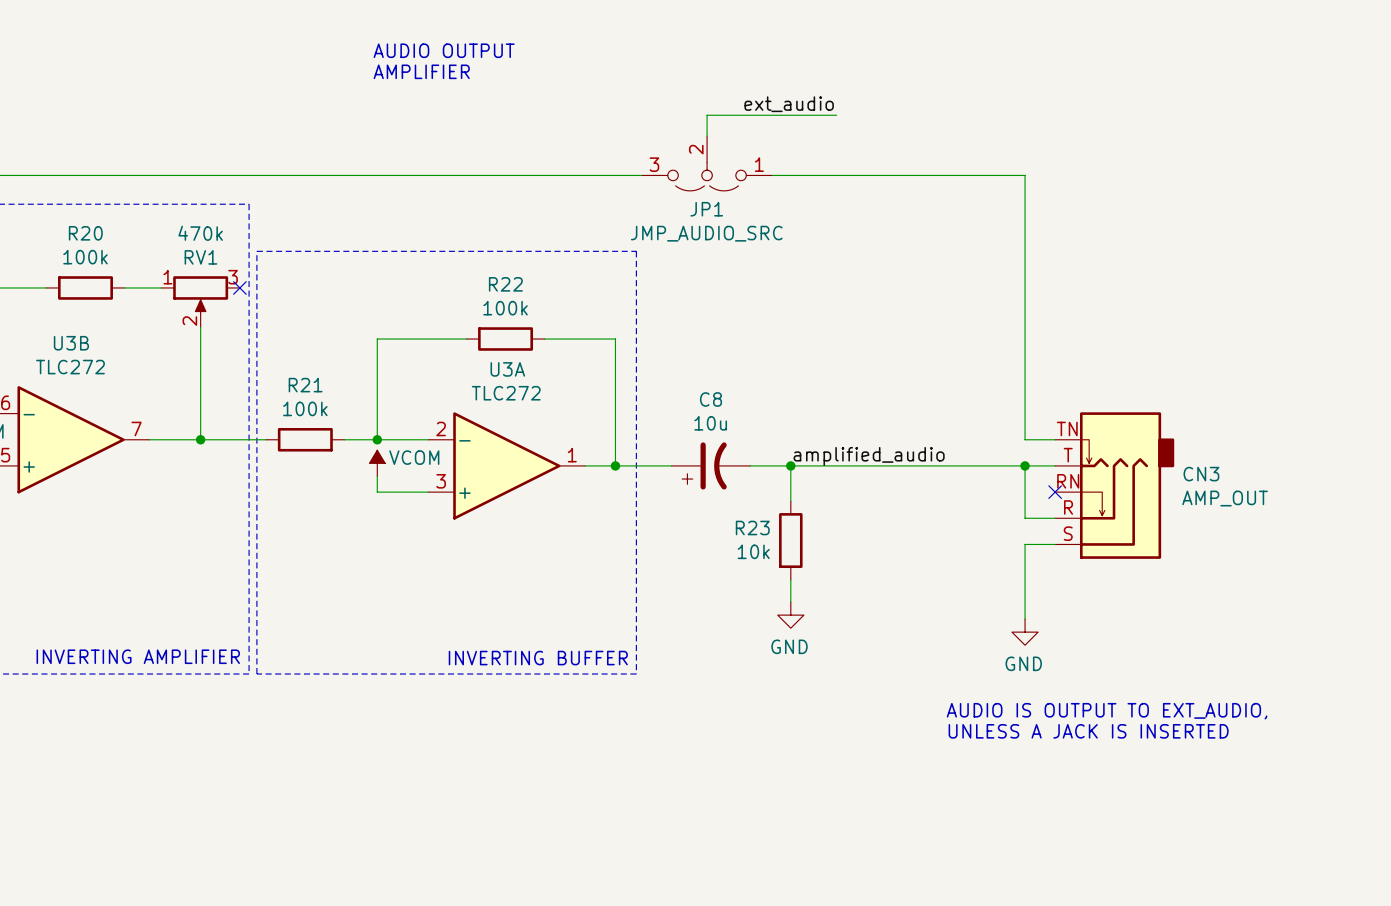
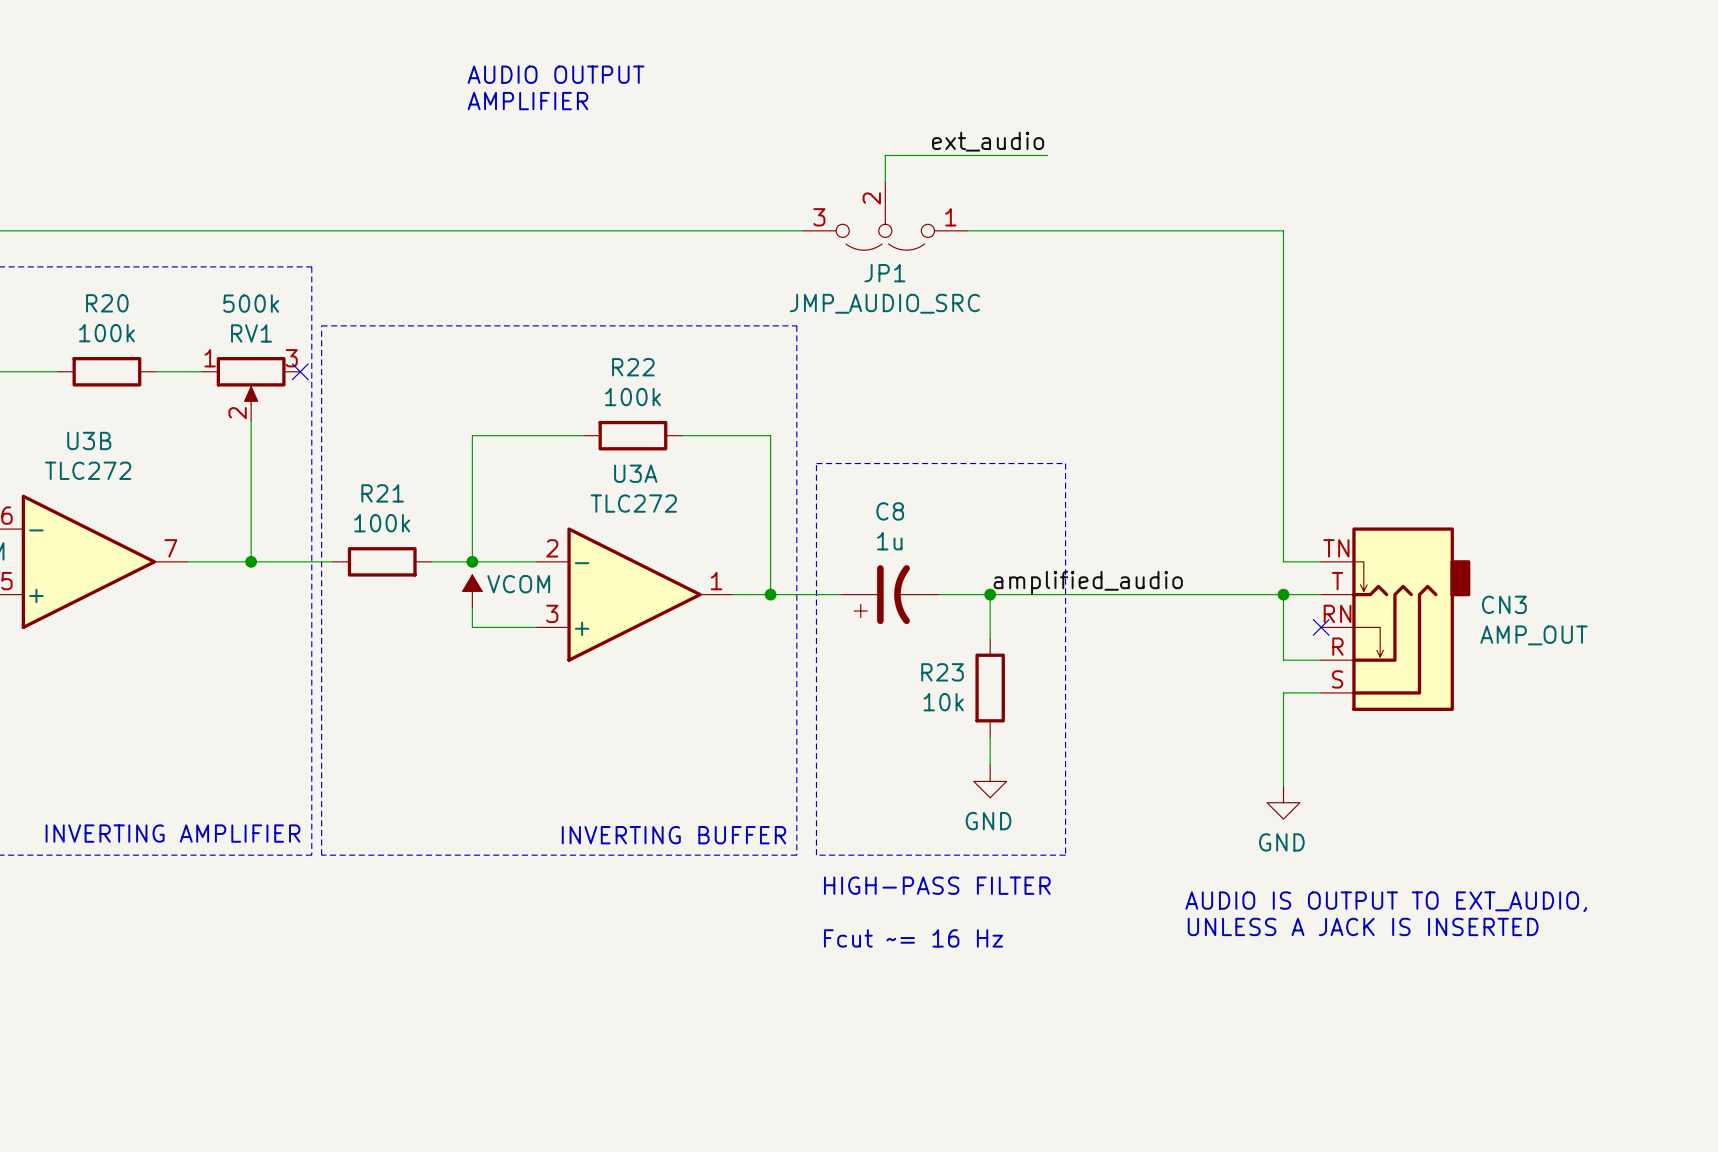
RV1 value: 470k (200, 233) -> 500k (251, 303)
line: none -> (816, 463) (1065, 463) (1065, 855) (816, 855) (816, 463)
C8 value: 10u (710, 423) -> 1u (889, 541)
text: none -> HIGH-PASS FILTER (937, 885)
text: none -> Fcut ~= 16 Hz (913, 938)

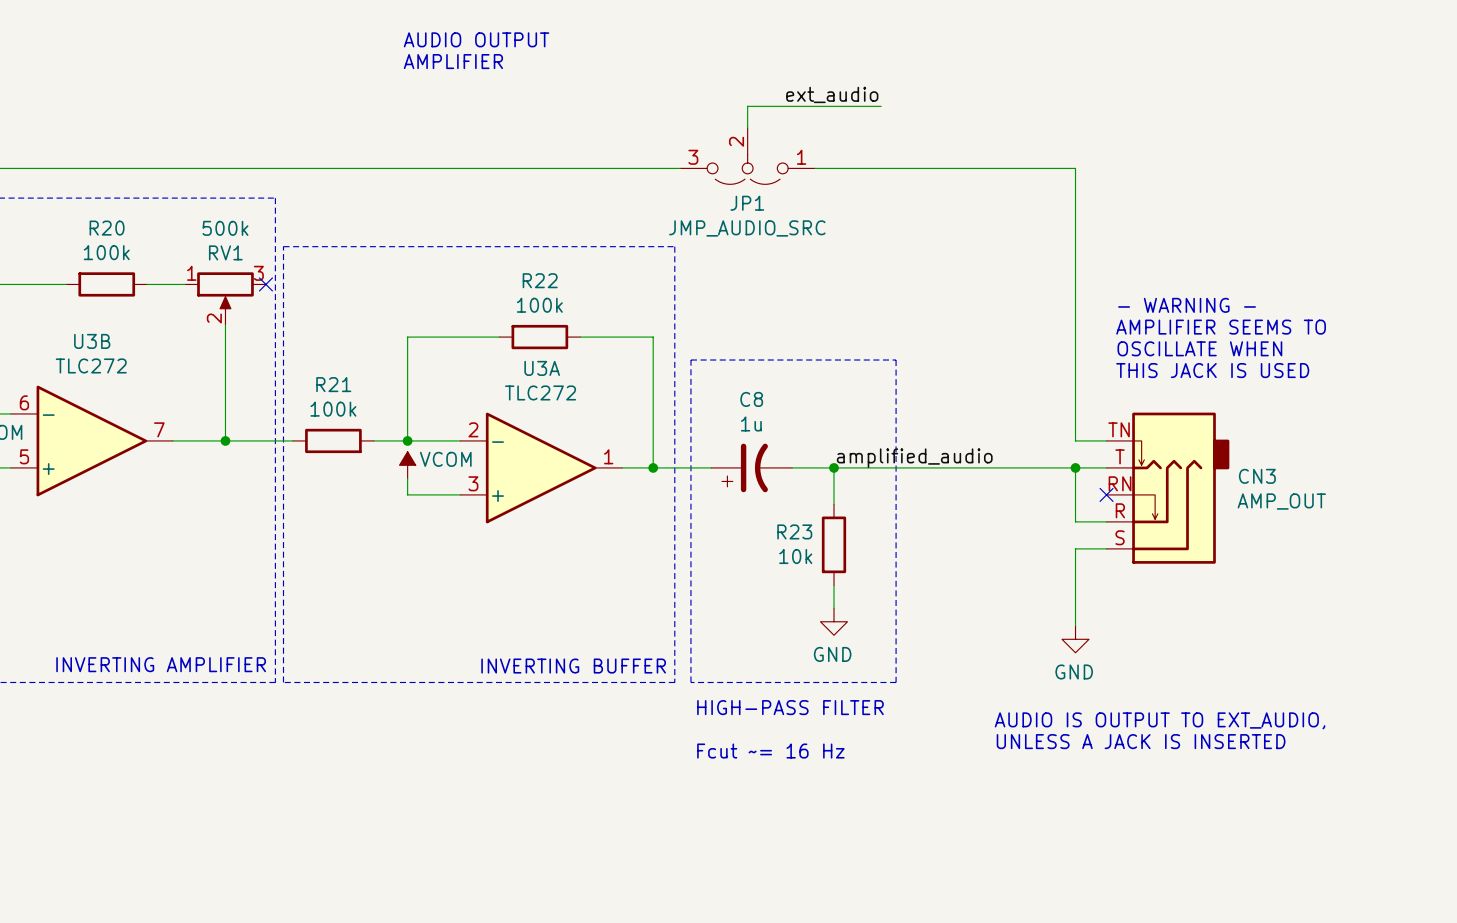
text: none -> - WARNING - (1187, 305)
text: none -> AMPLIFIER SEEMS TO (1221, 327)
text: none -> OSCILLATE WHEN (1199, 348)
text: none -> THIS JACK IS USED (1212, 370)

